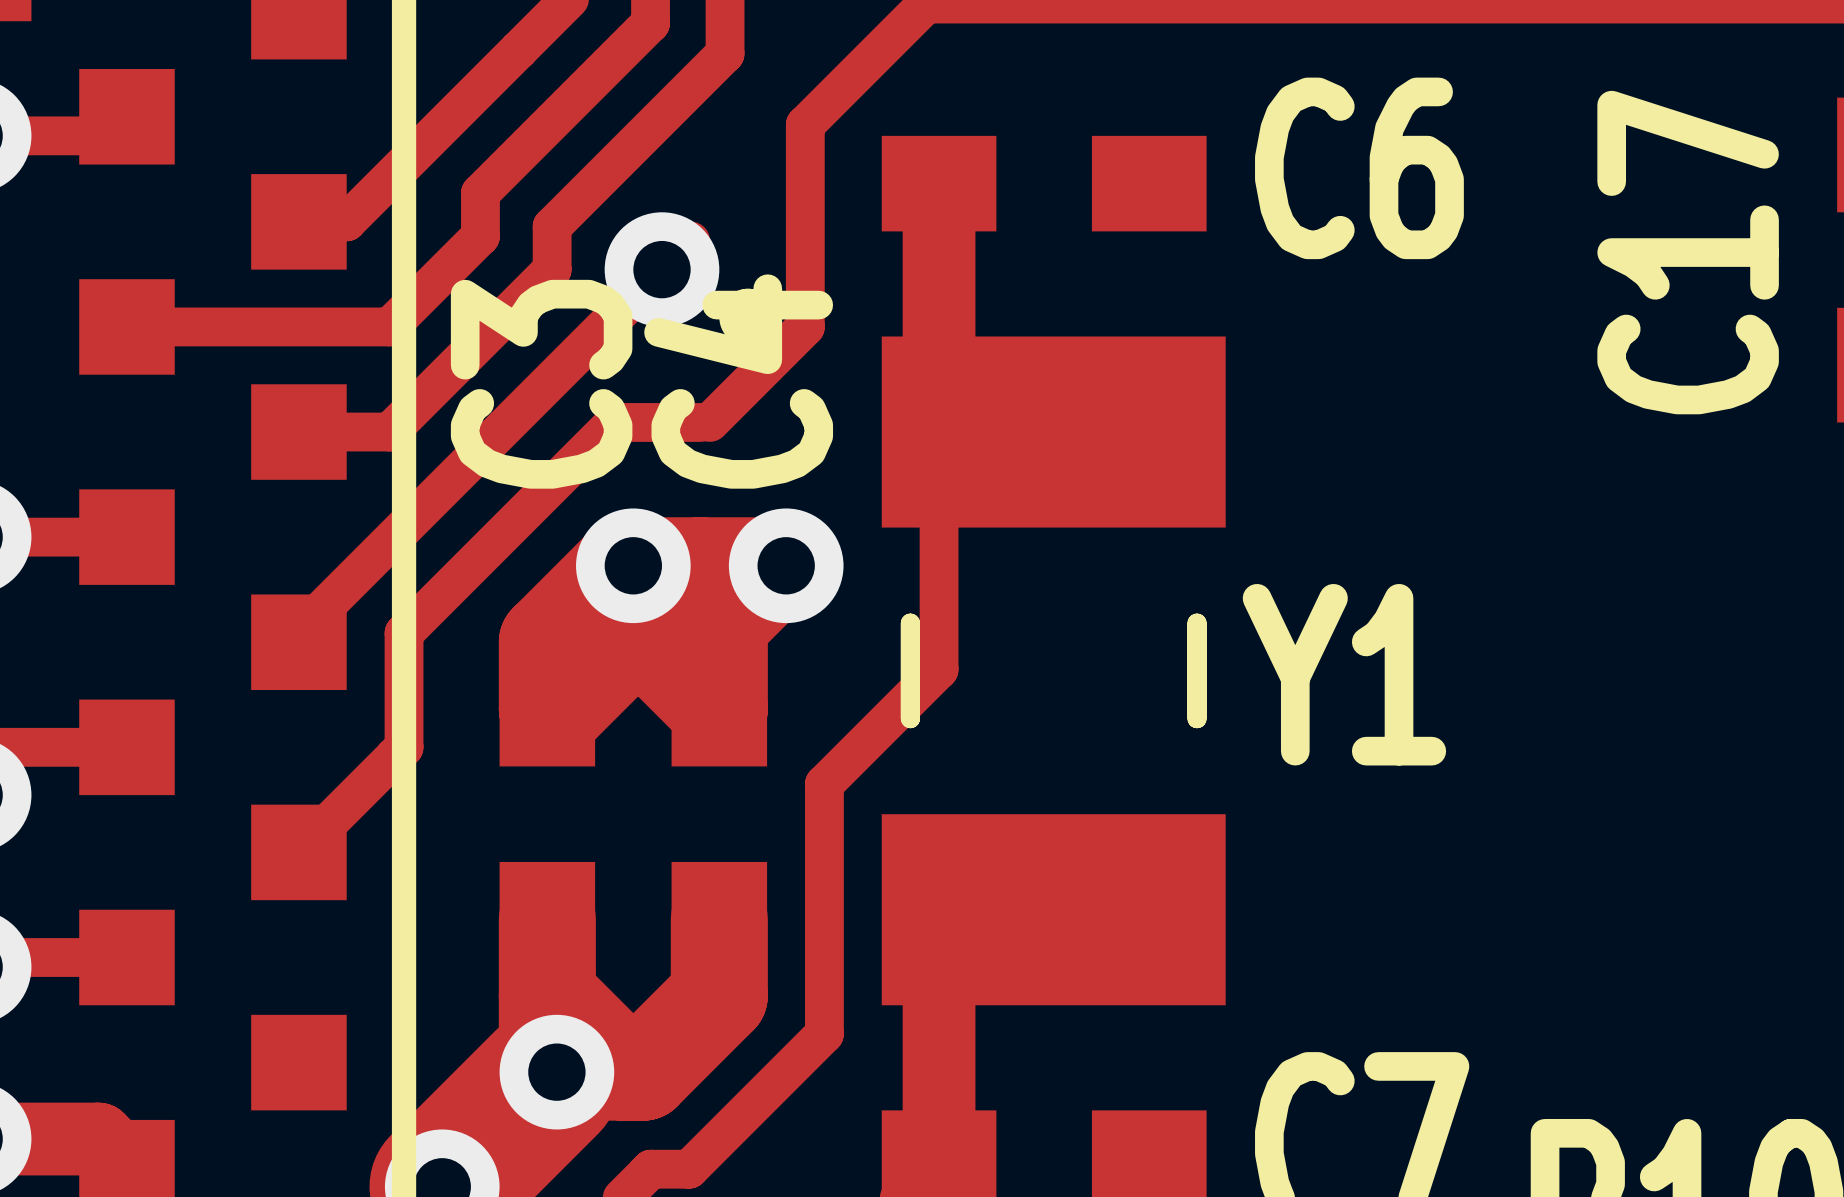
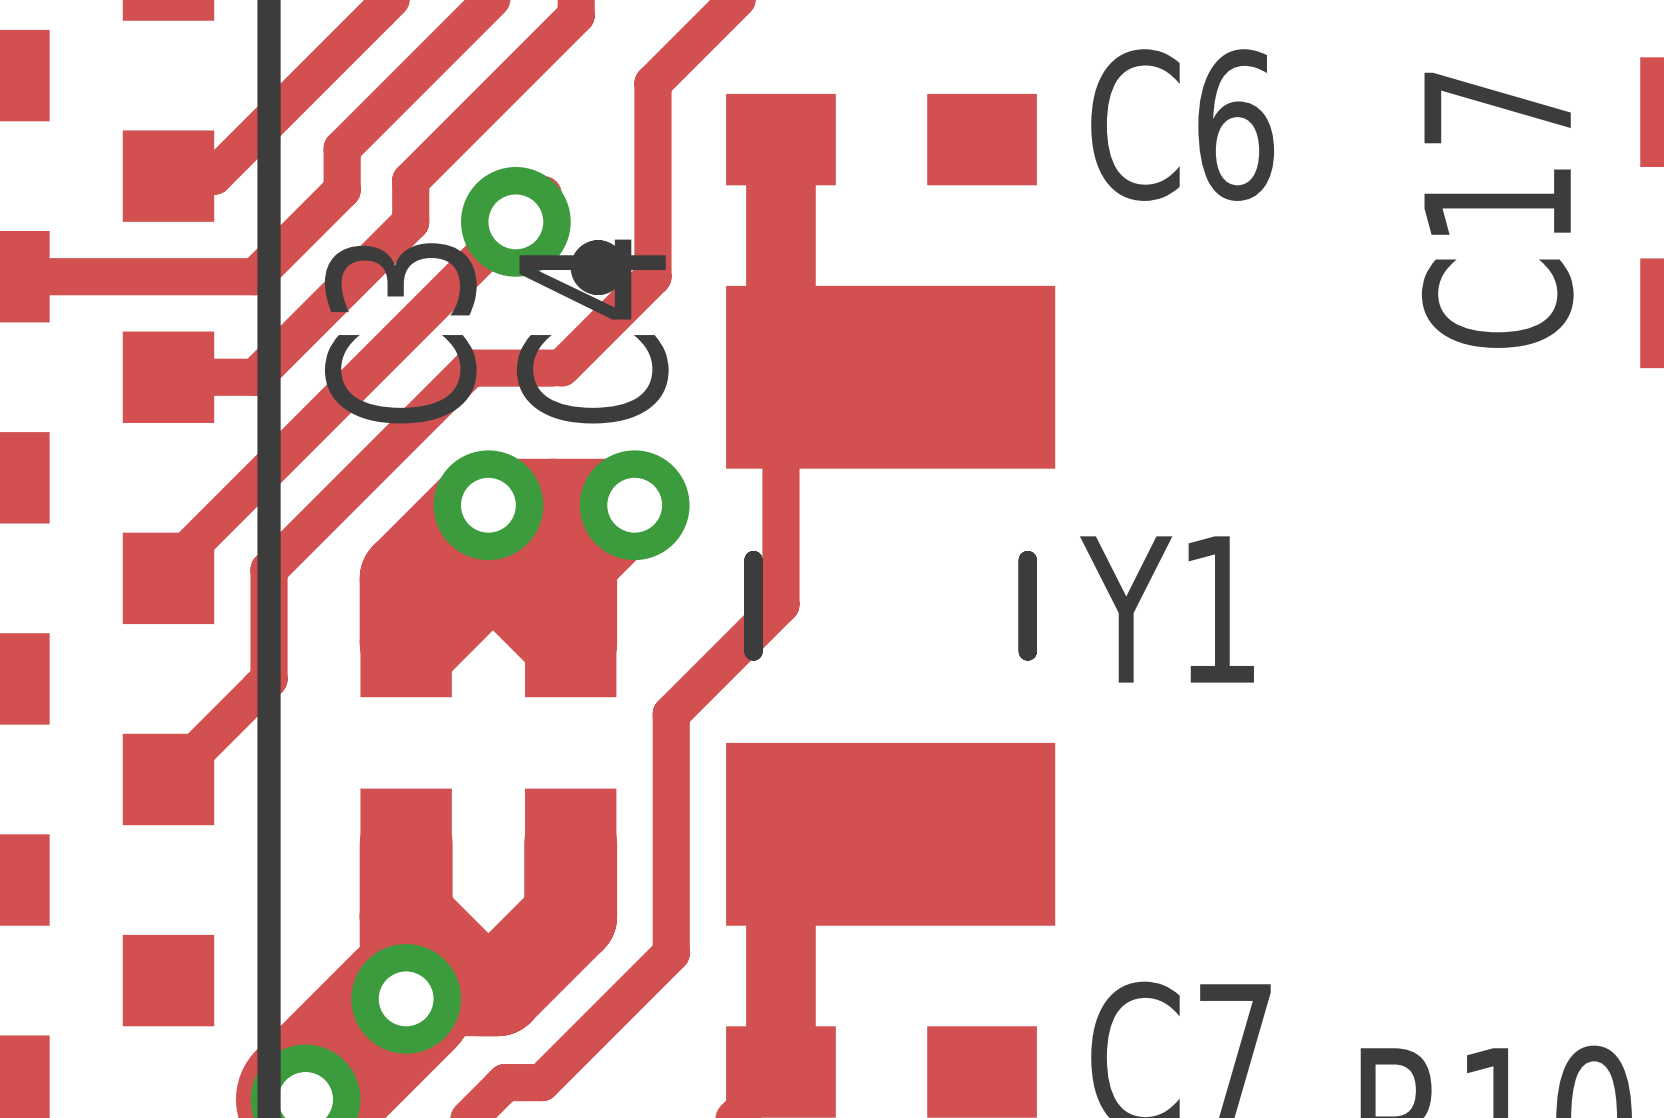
via position: (556, 1072) -> (406, 998)

